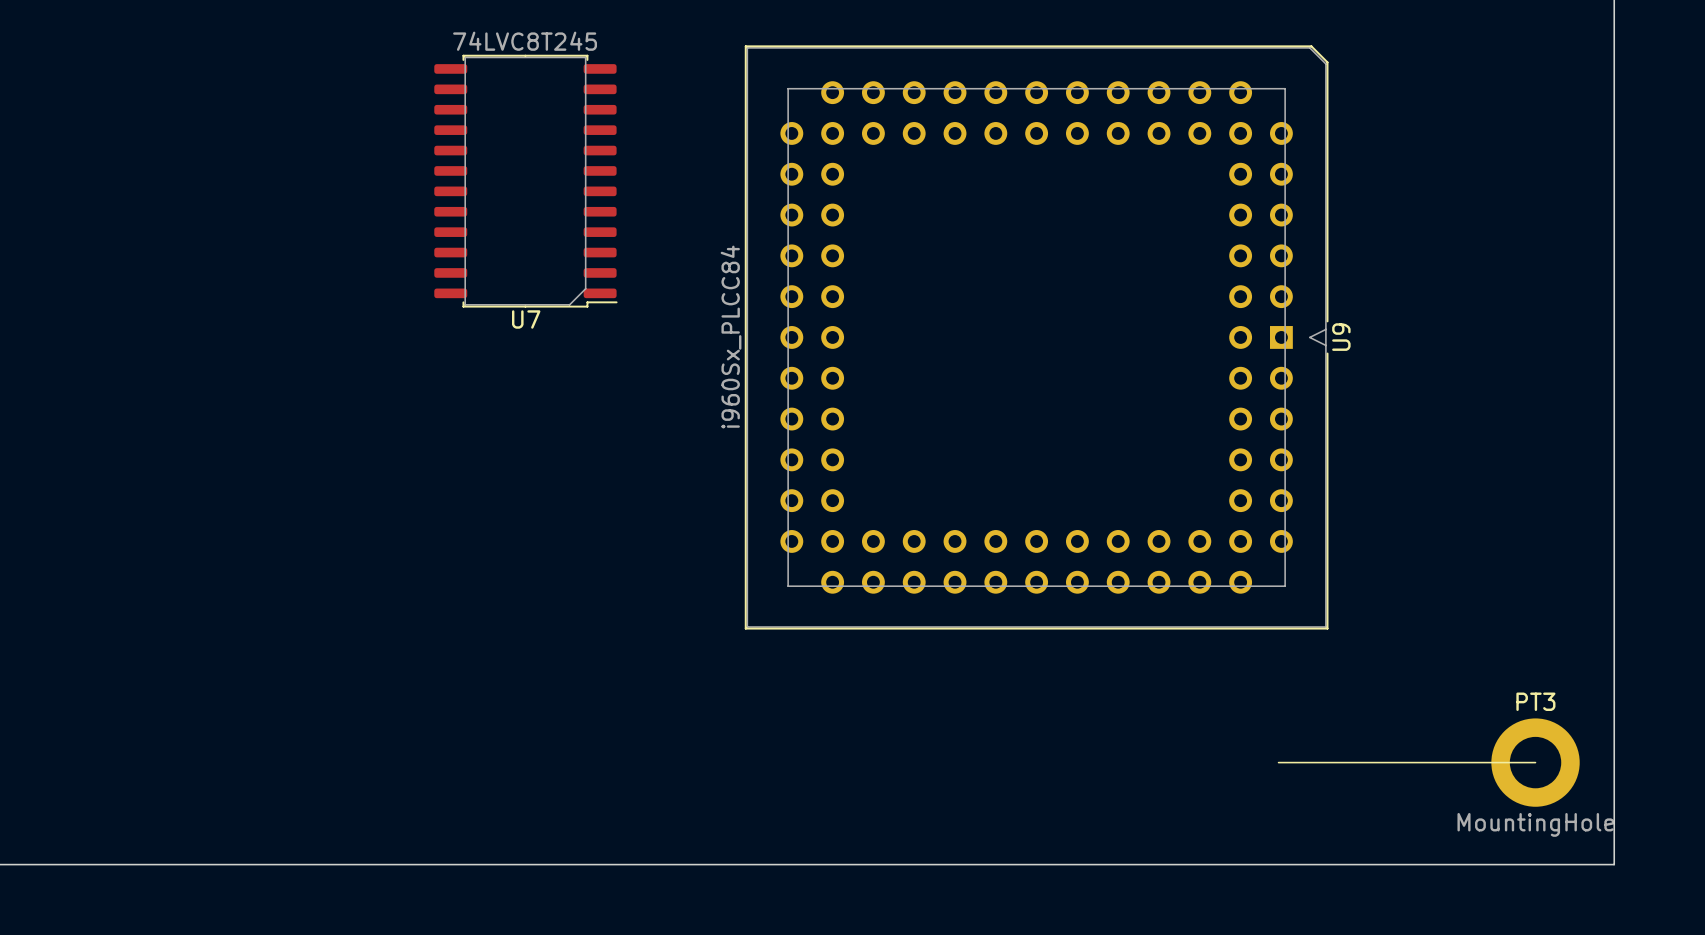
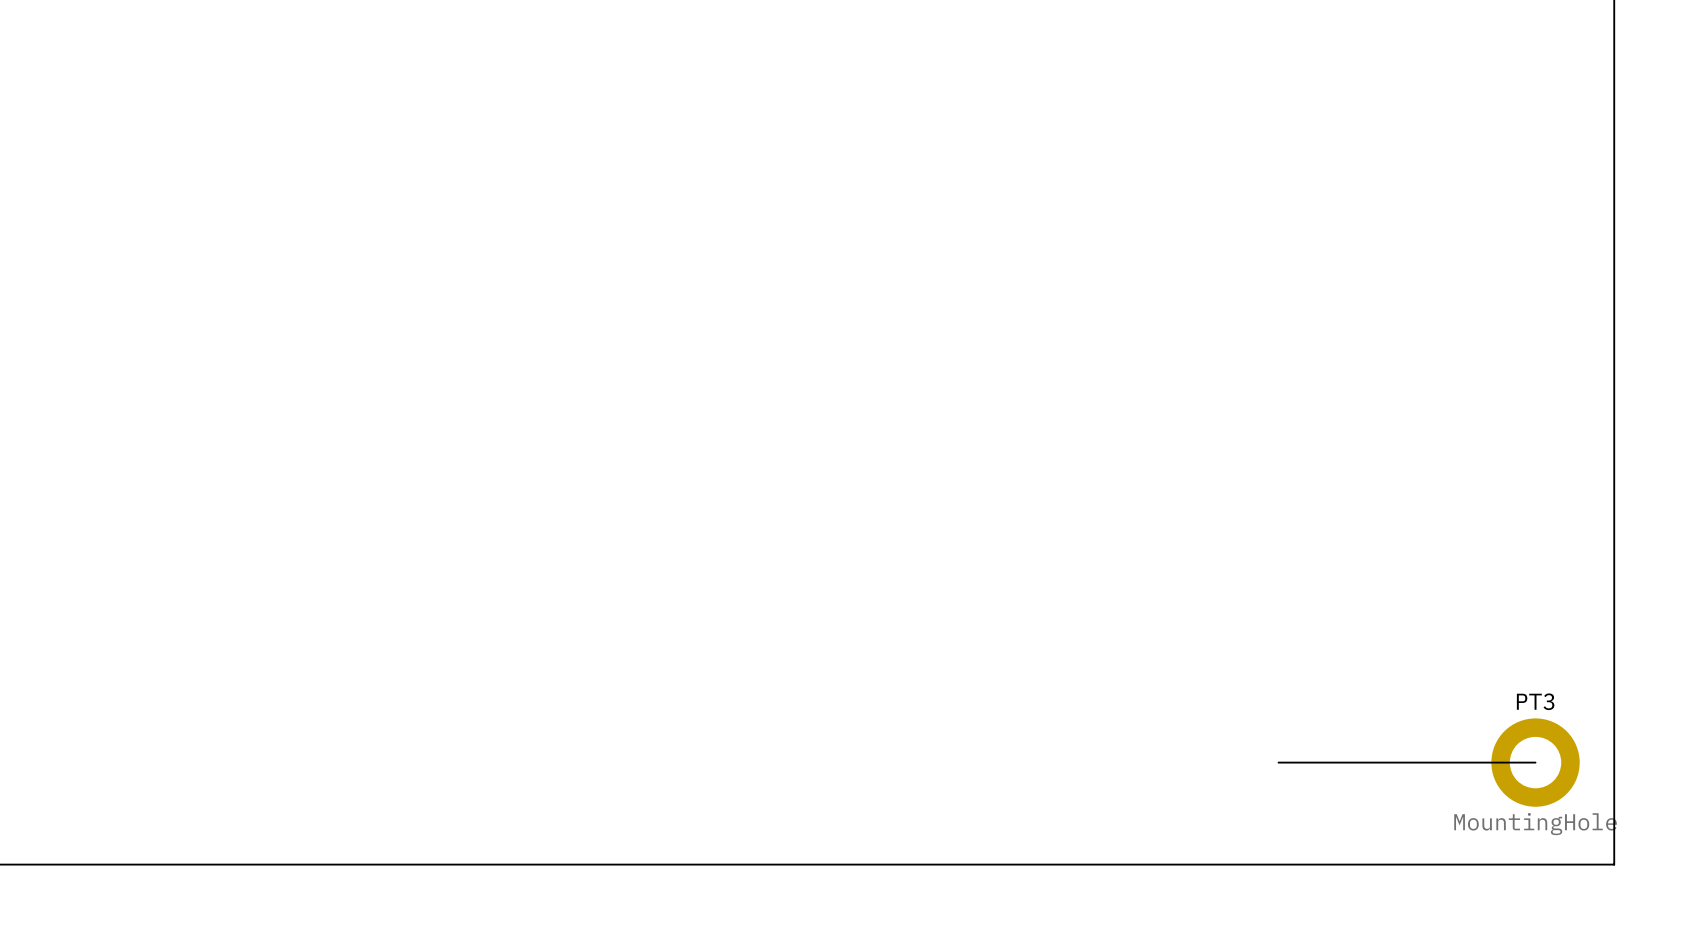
U7: 74LVC8T245 (525, 181) -> none
U9: i960Sx_PLCC84 (1036, 337) -> none

